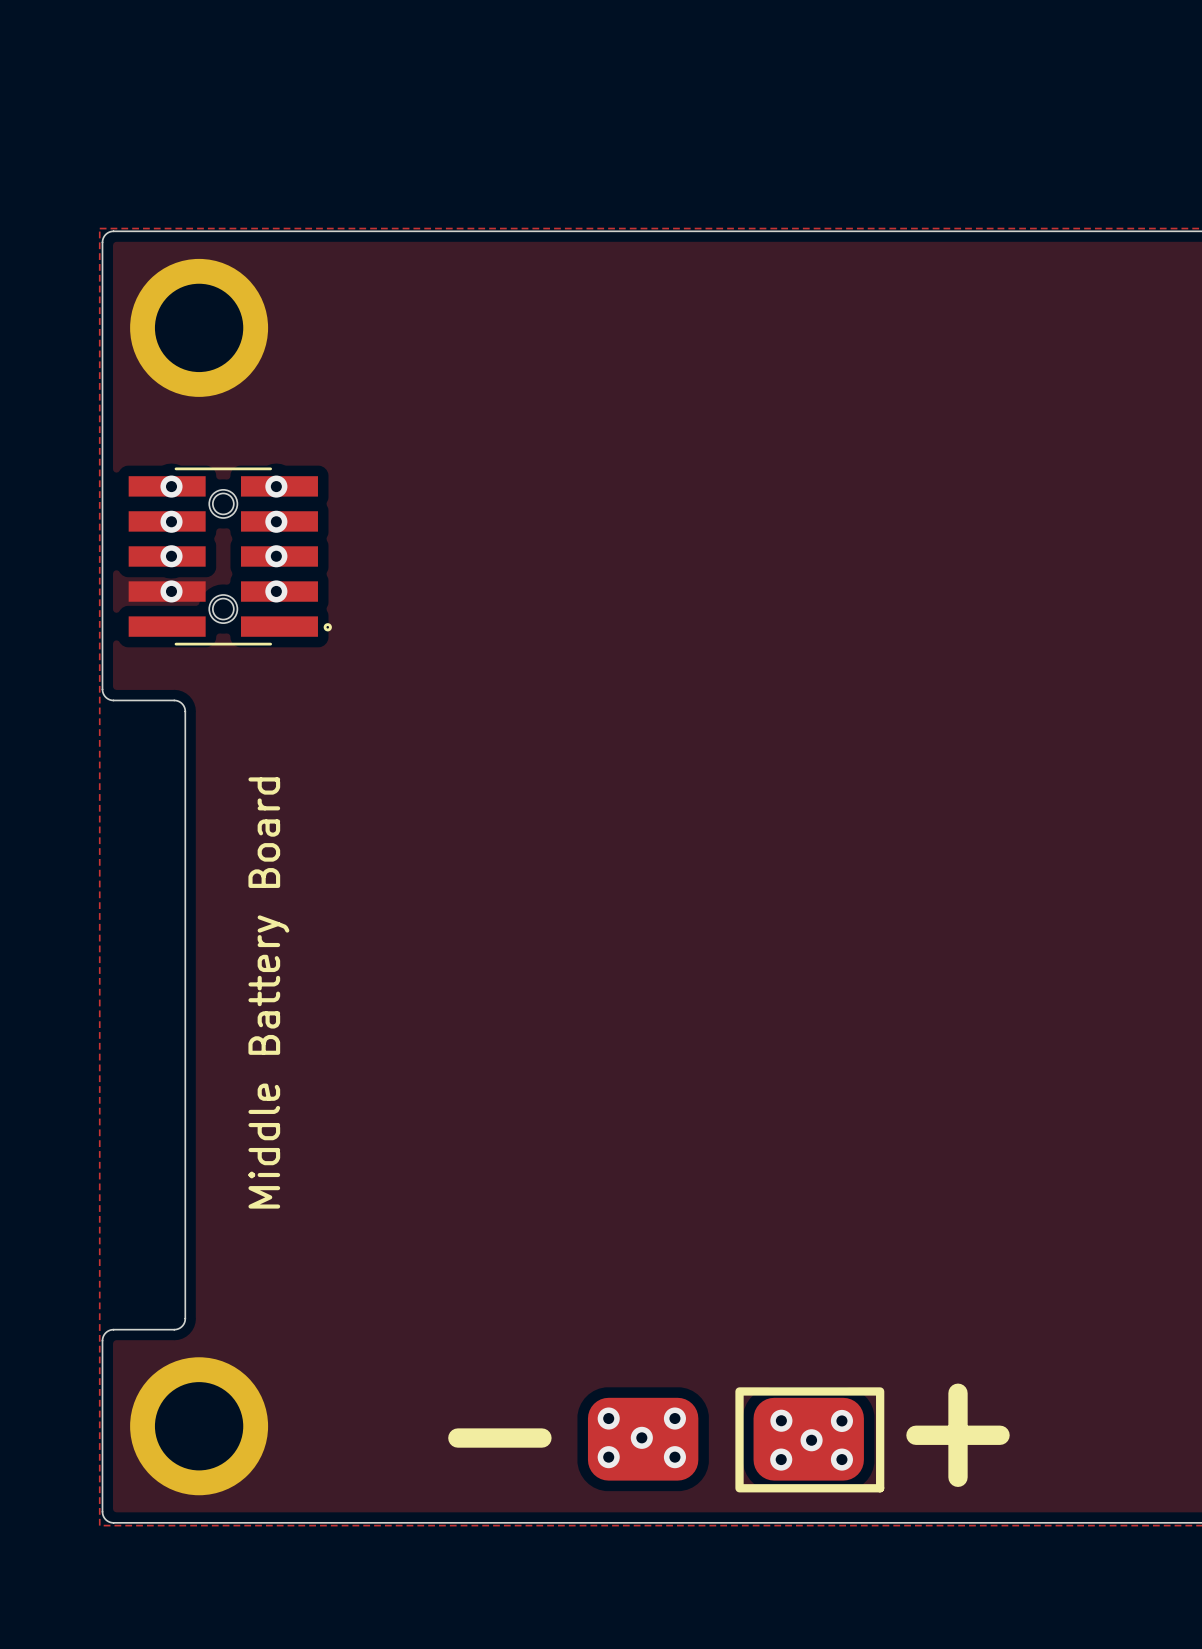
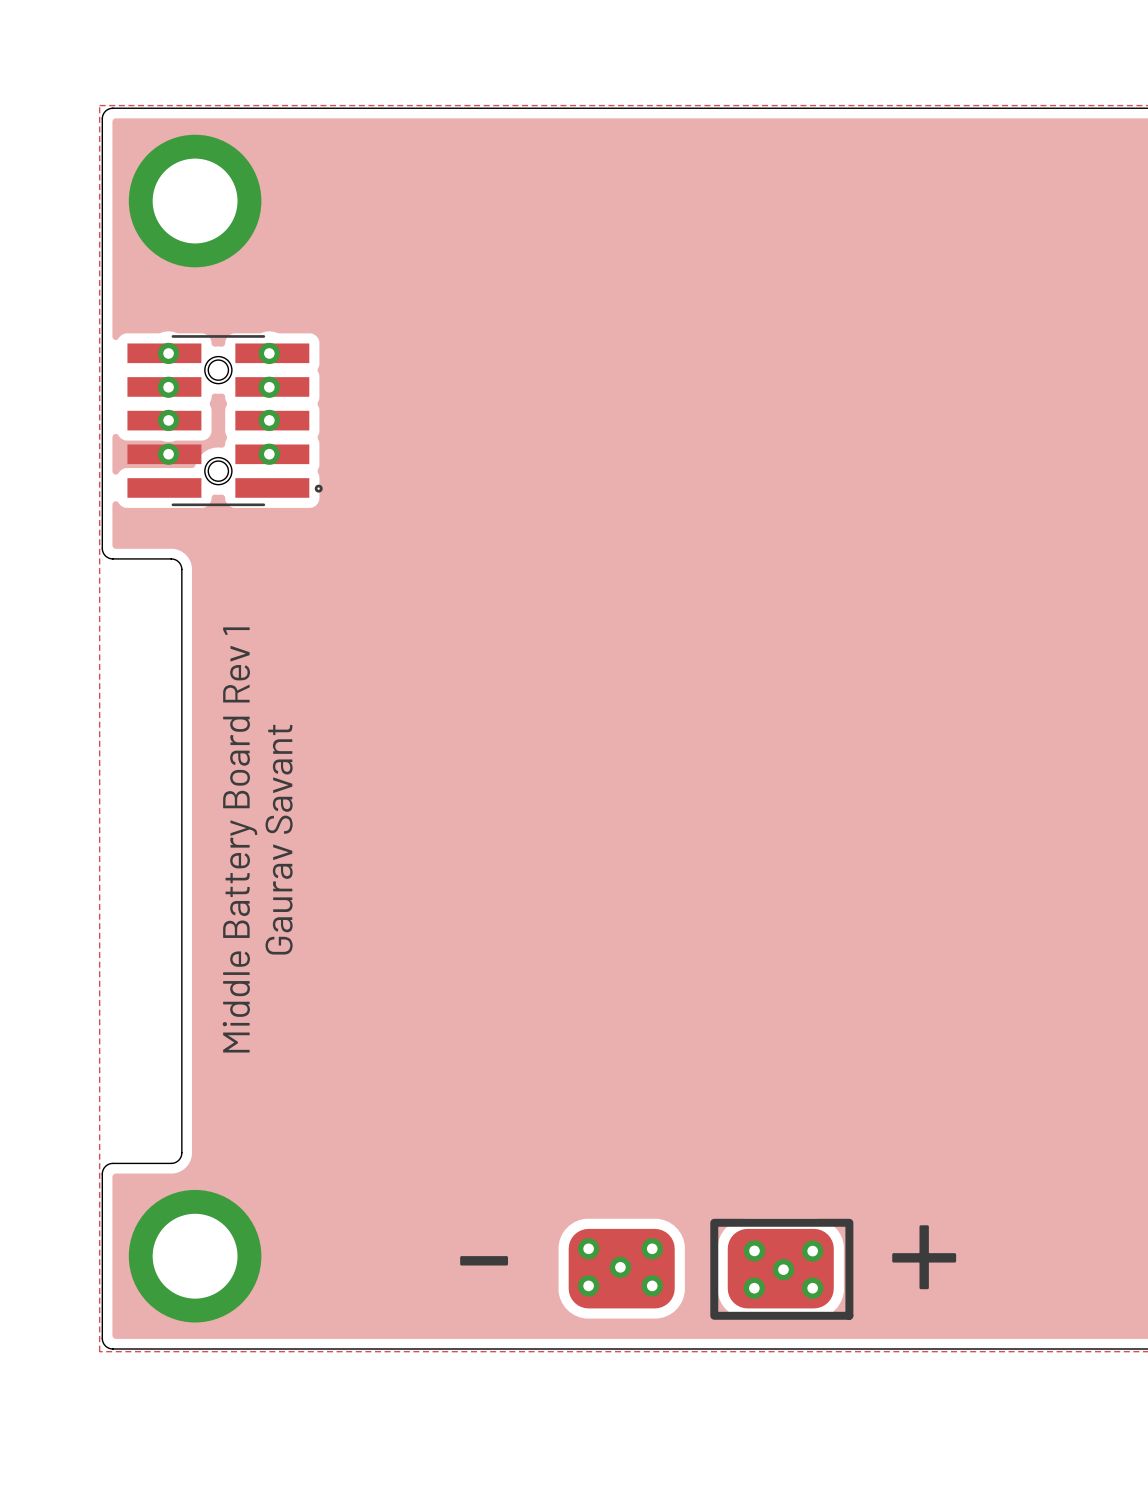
text: none -> Gaurav Savant (279, 839)
text: Middle Battery Board (268, 992) -> Middle Battery Board Rev 1 (239, 839)

